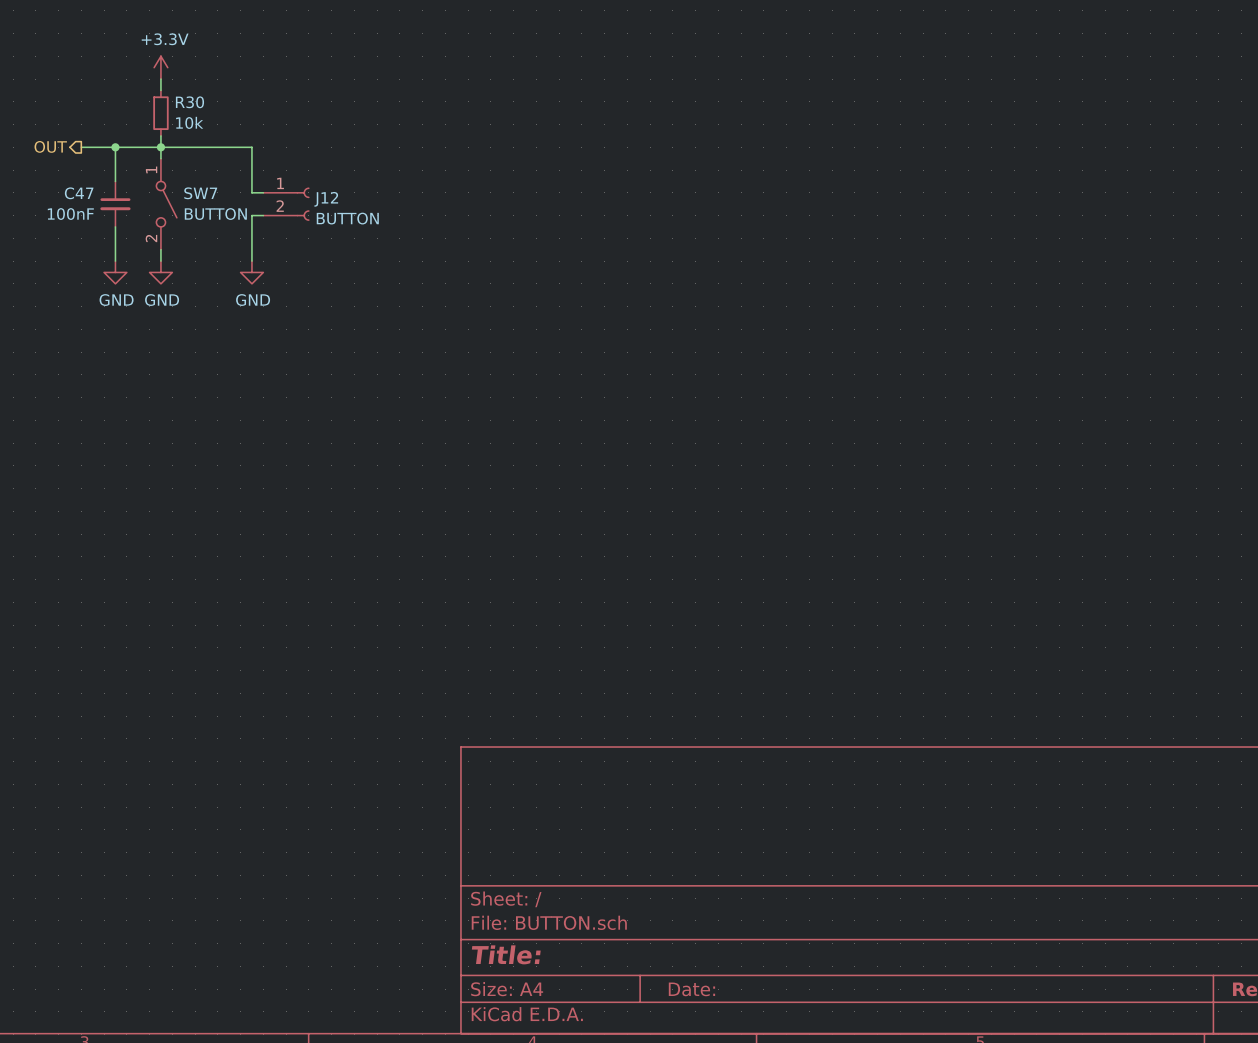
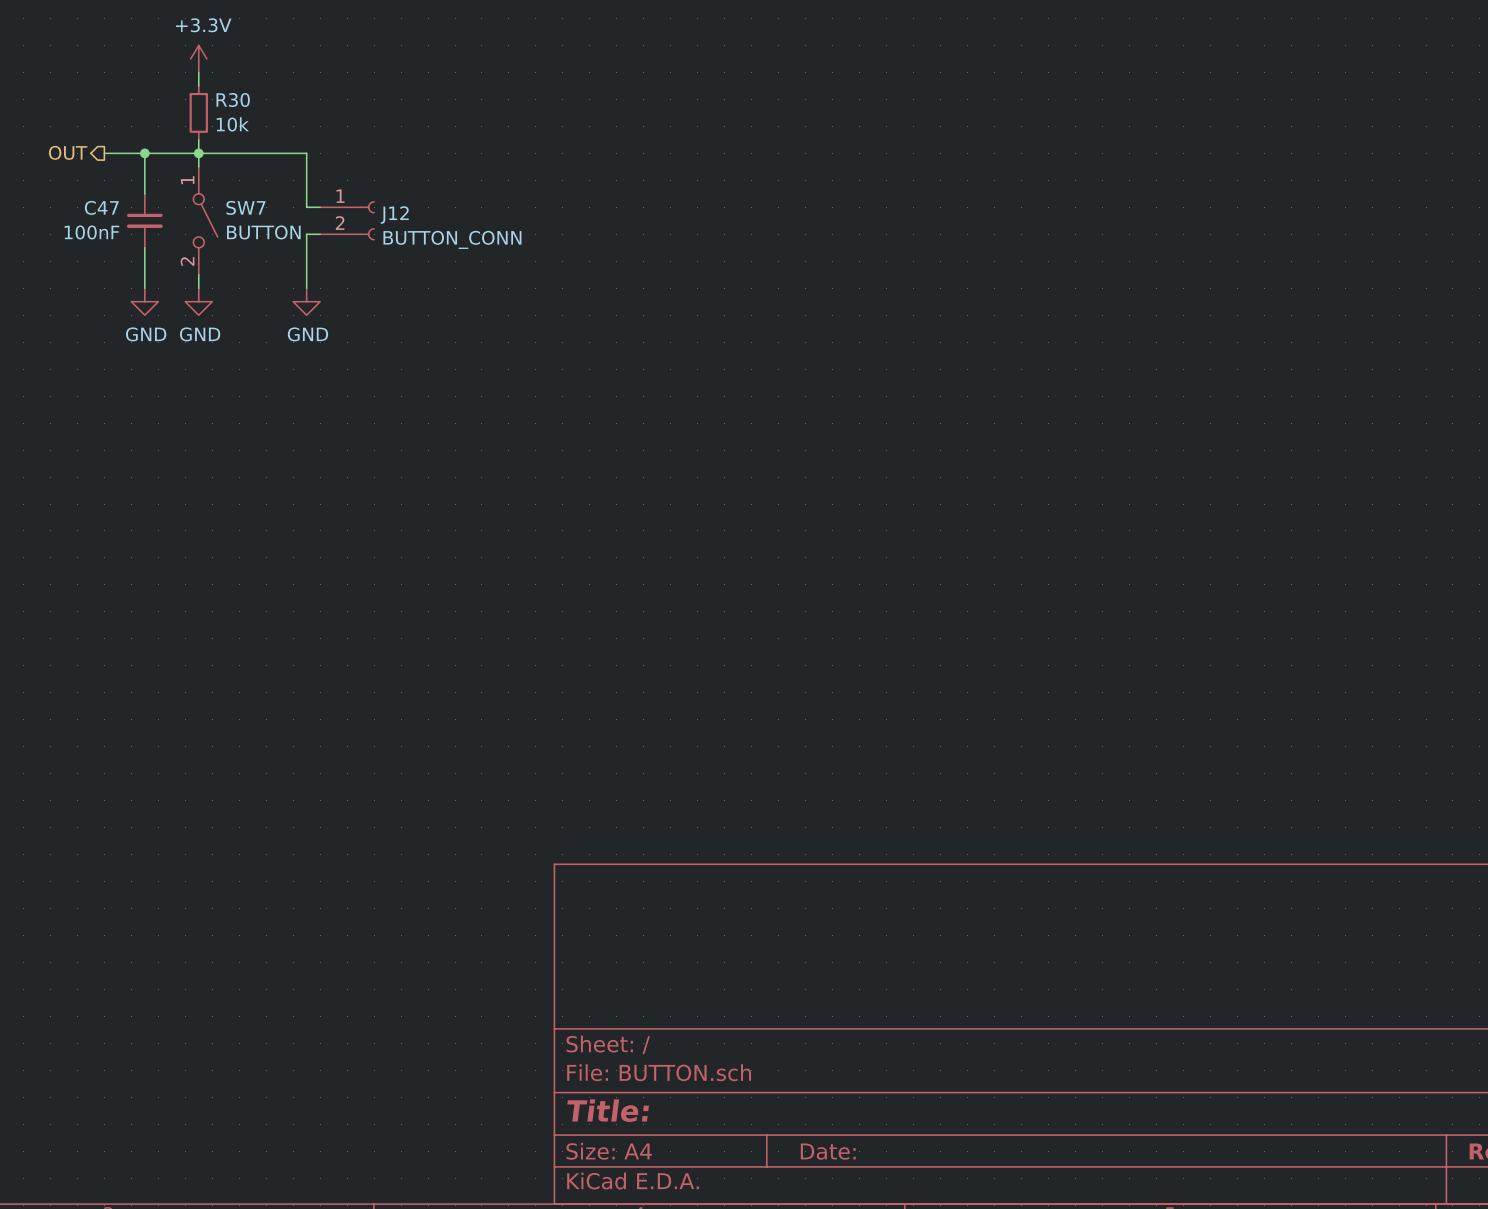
J12 value: BUTTON (347, 218) -> BUTTON_CONN (452, 239)

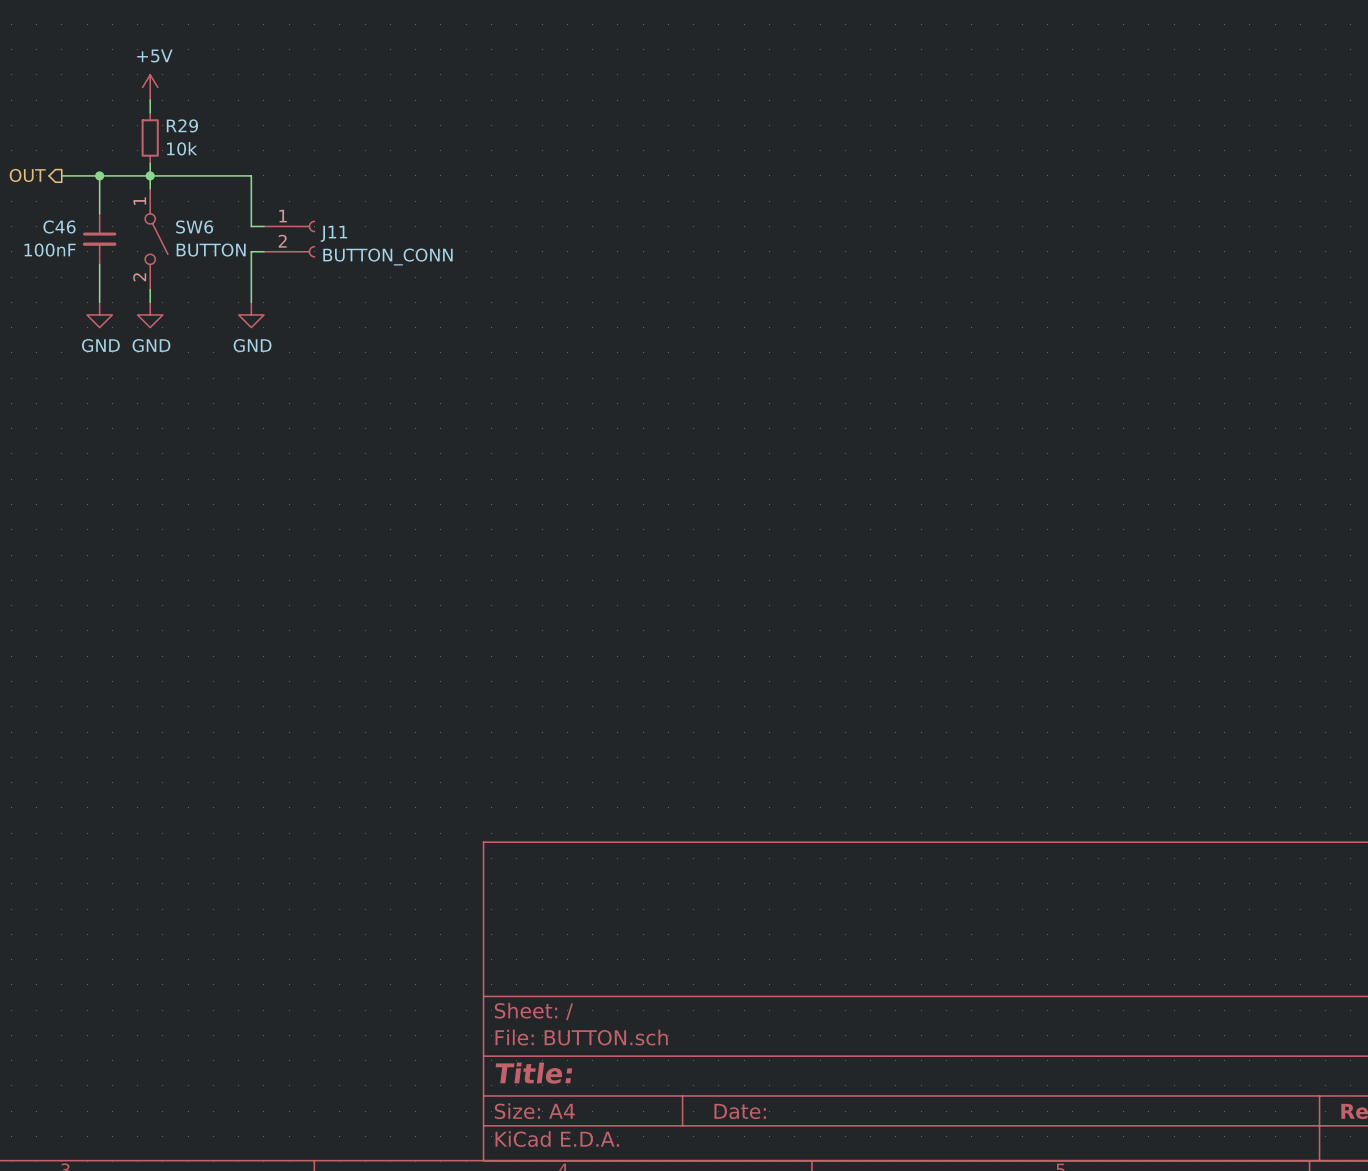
power symbol: +3.3V (198, 58) -> +5V (150, 87)
R30 name: R30 (233, 100) -> R29 (182, 125)
C47 name: C47 (101, 207) -> C46 (59, 227)
SW7 name: SW7 (245, 207) -> SW6 (194, 227)
J12 name: J12 (394, 215) -> J11 (333, 233)

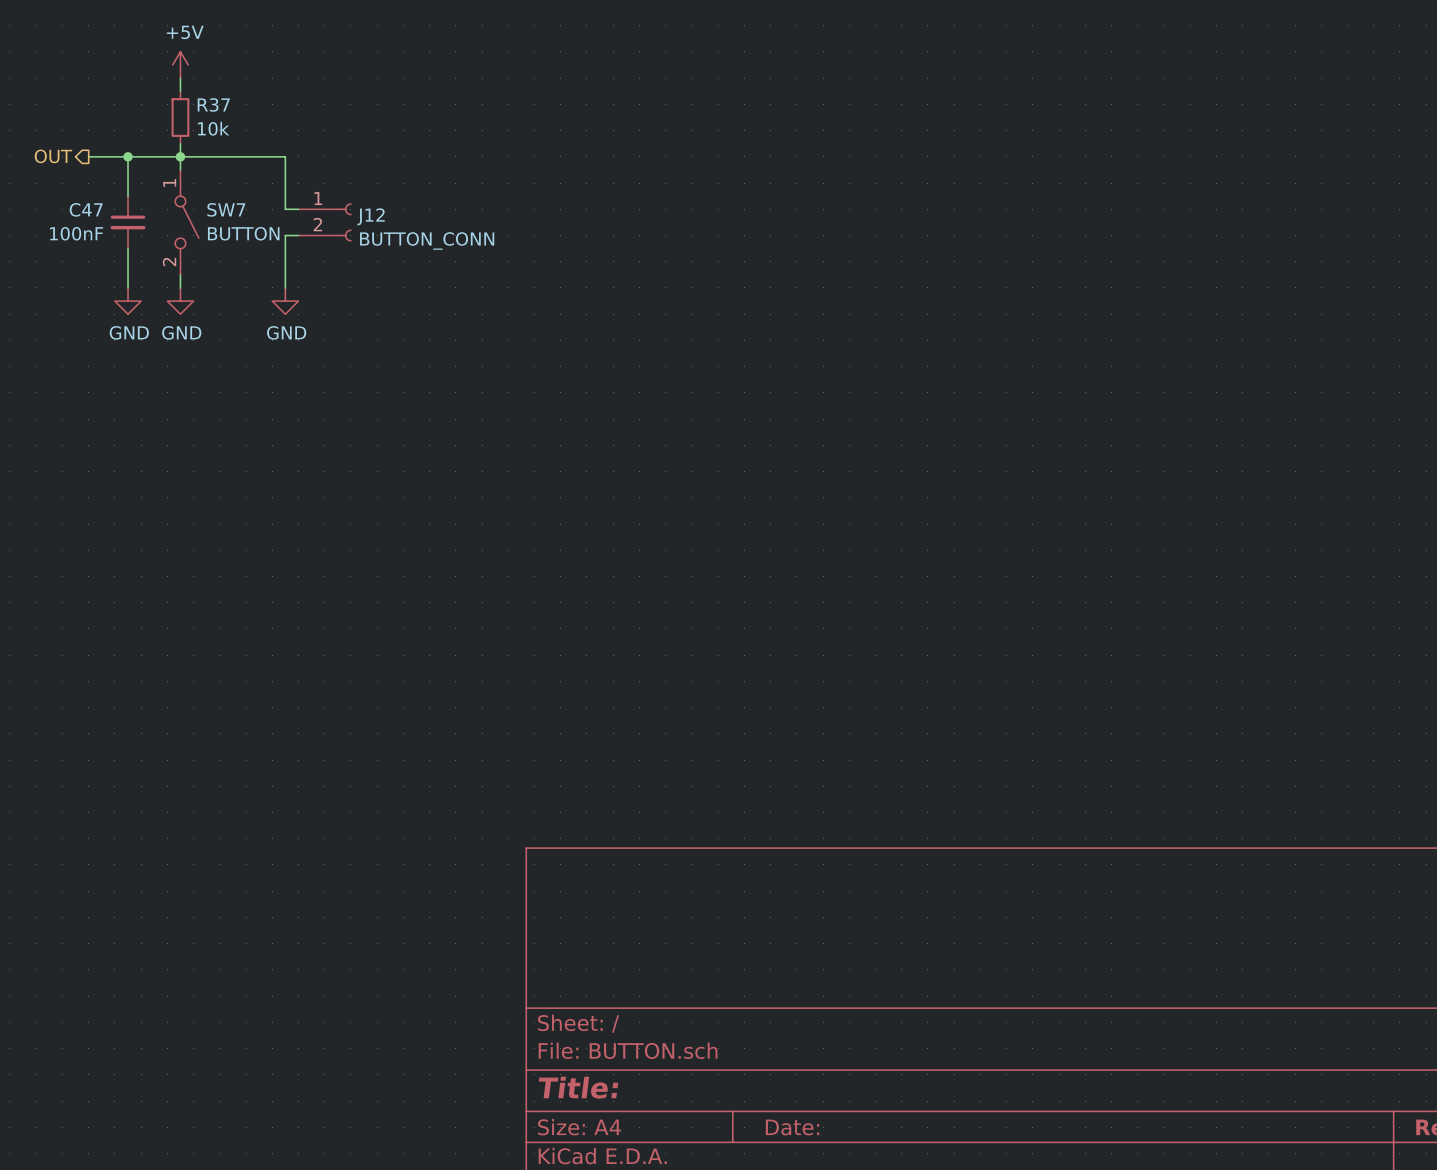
R29 name: R29 (182, 125) -> R37 (213, 104)
C46 name: C46 (59, 227) -> C47 (86, 209)
SW6 name: SW6 (194, 227) -> SW7 (226, 209)
J11 name: J11 (333, 233) -> J12 (371, 216)

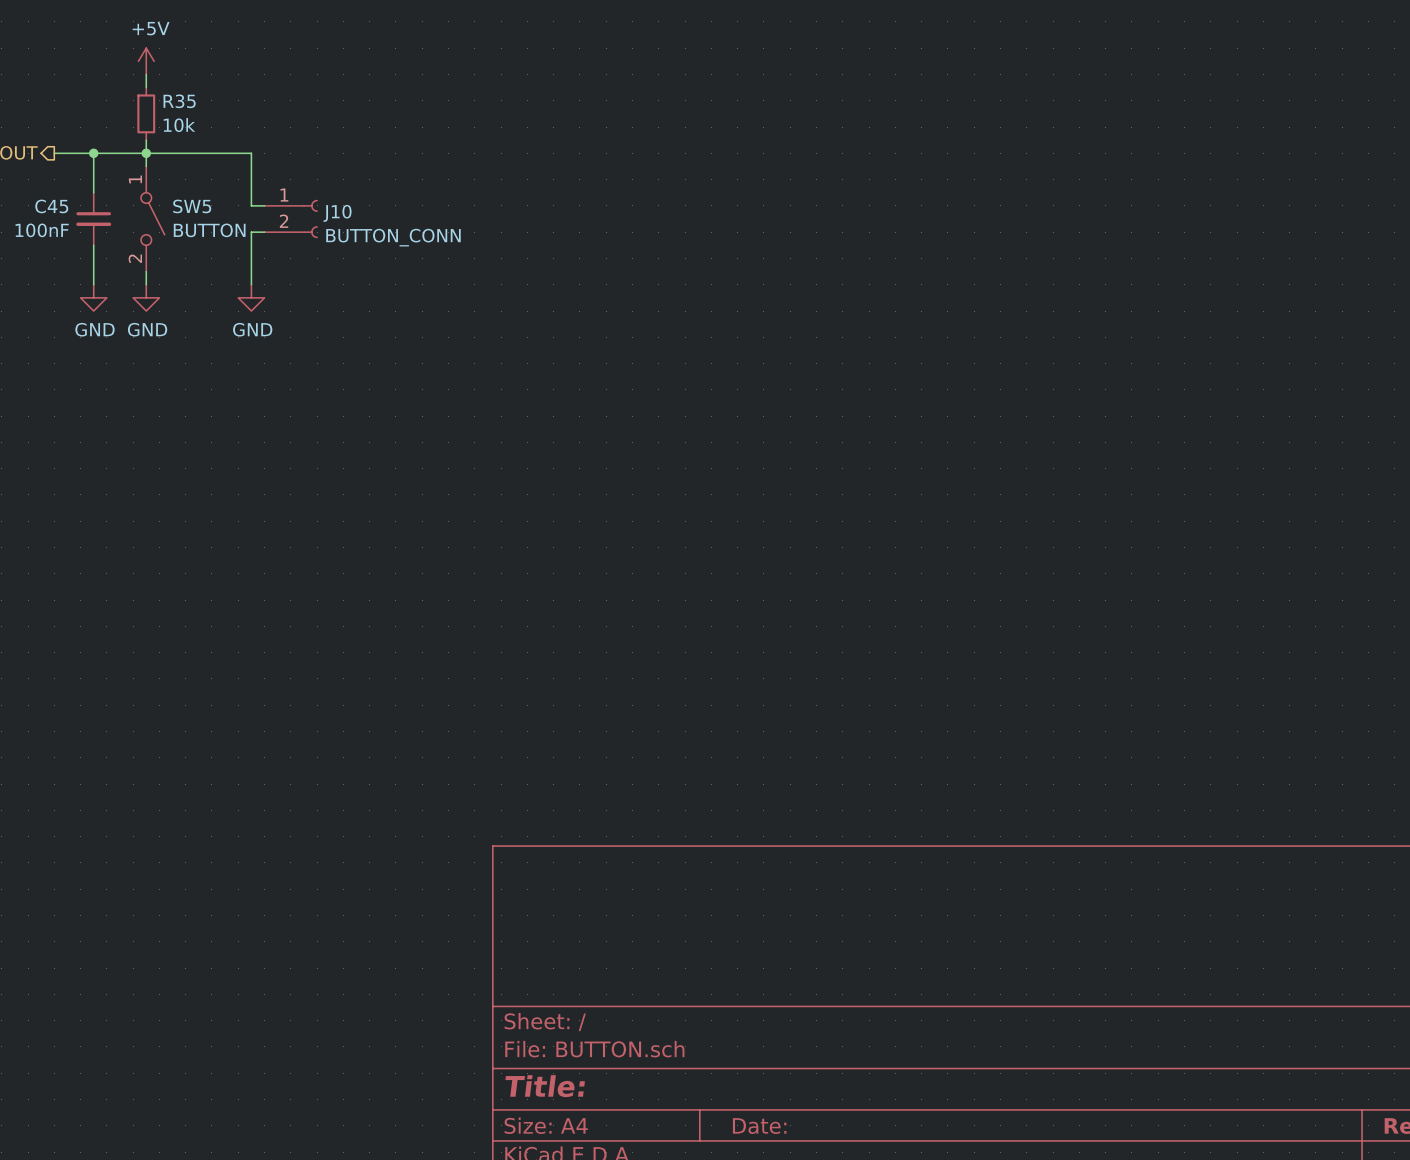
R37 name: R37 (213, 104) -> R35 (179, 101)
C47 name: C47 (86, 209) -> C45 (51, 206)
SW7 name: SW7 (226, 209) -> SW5 (192, 206)
J12 name: J12 (371, 216) -> J10 (337, 213)

